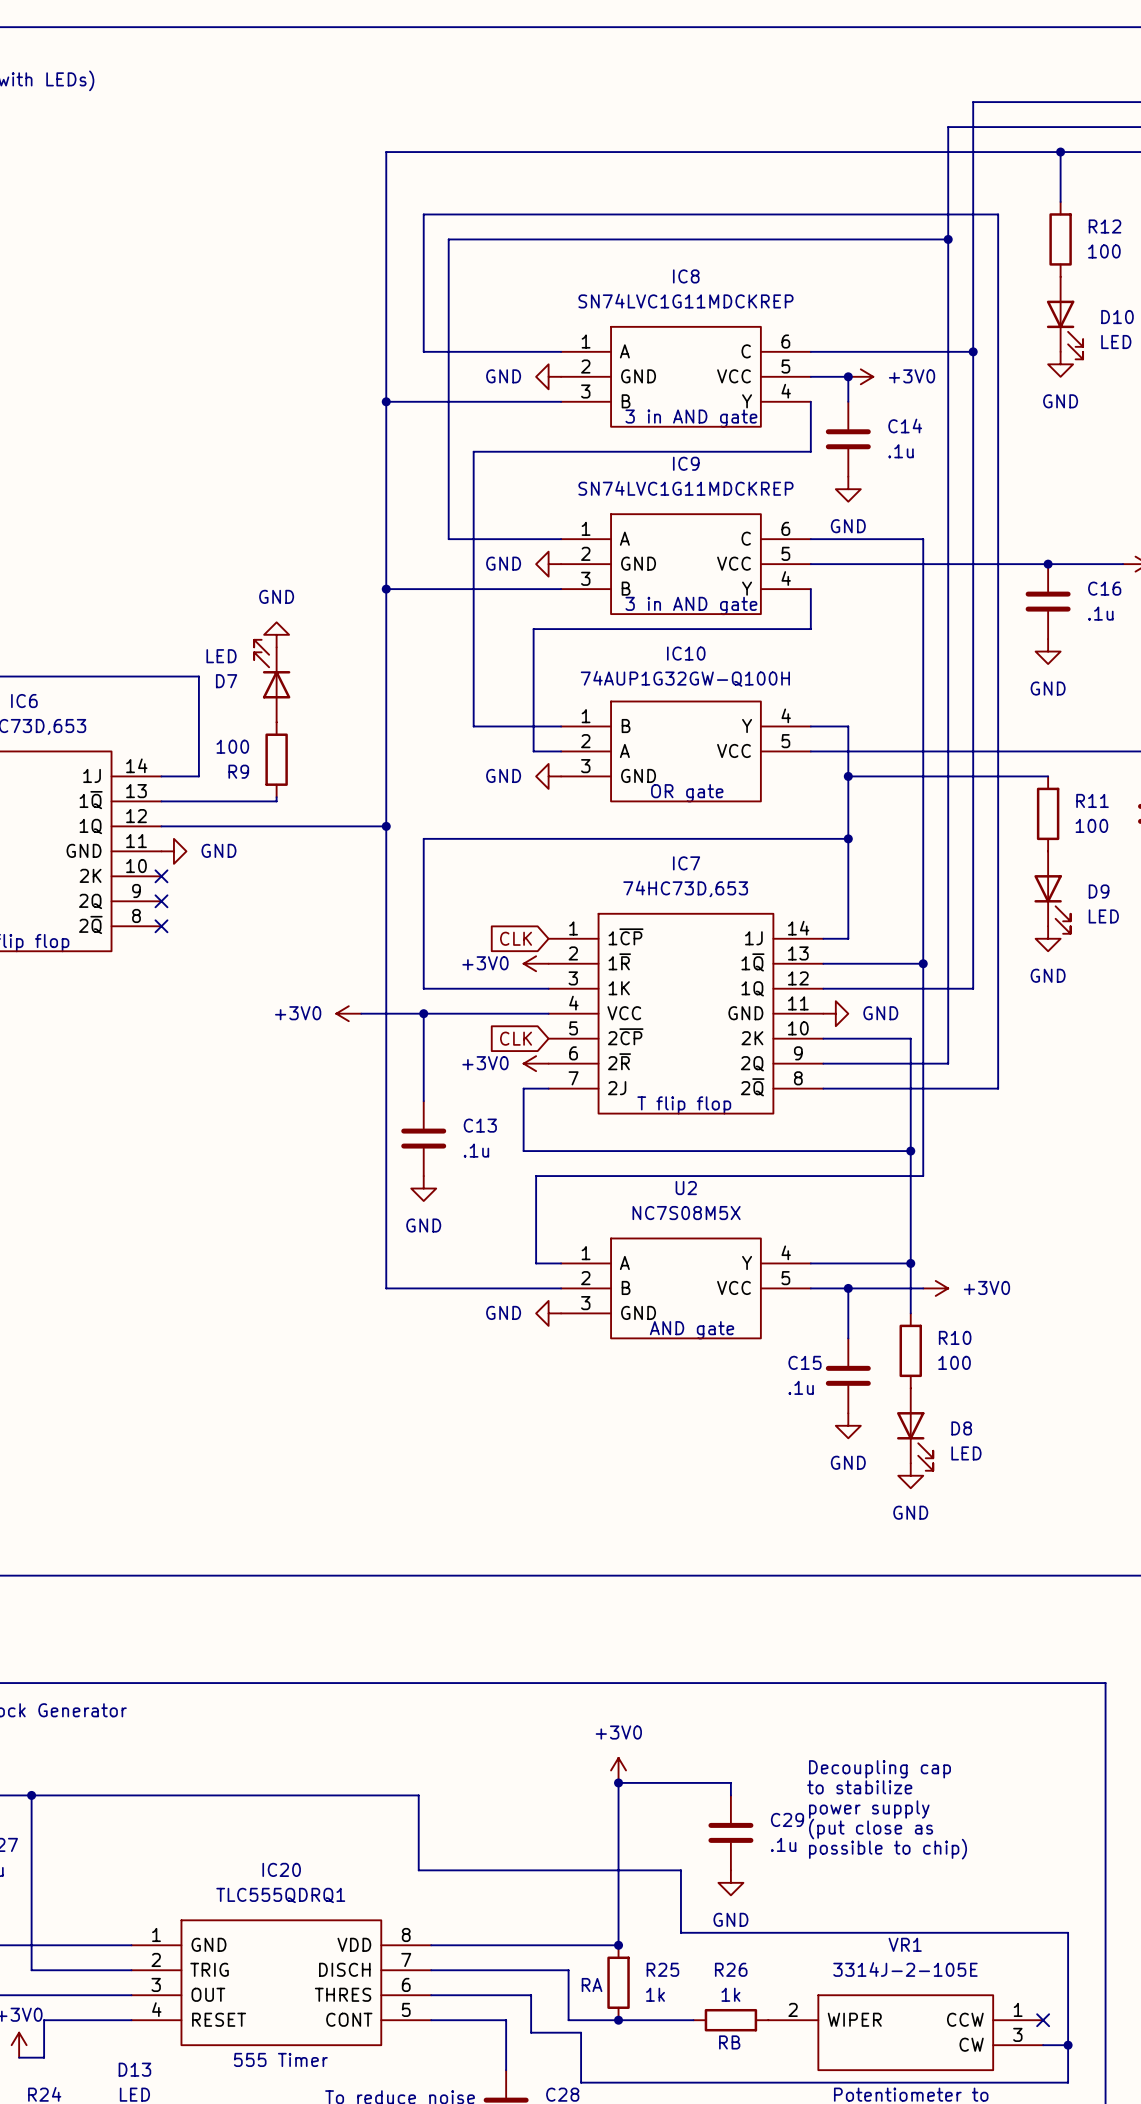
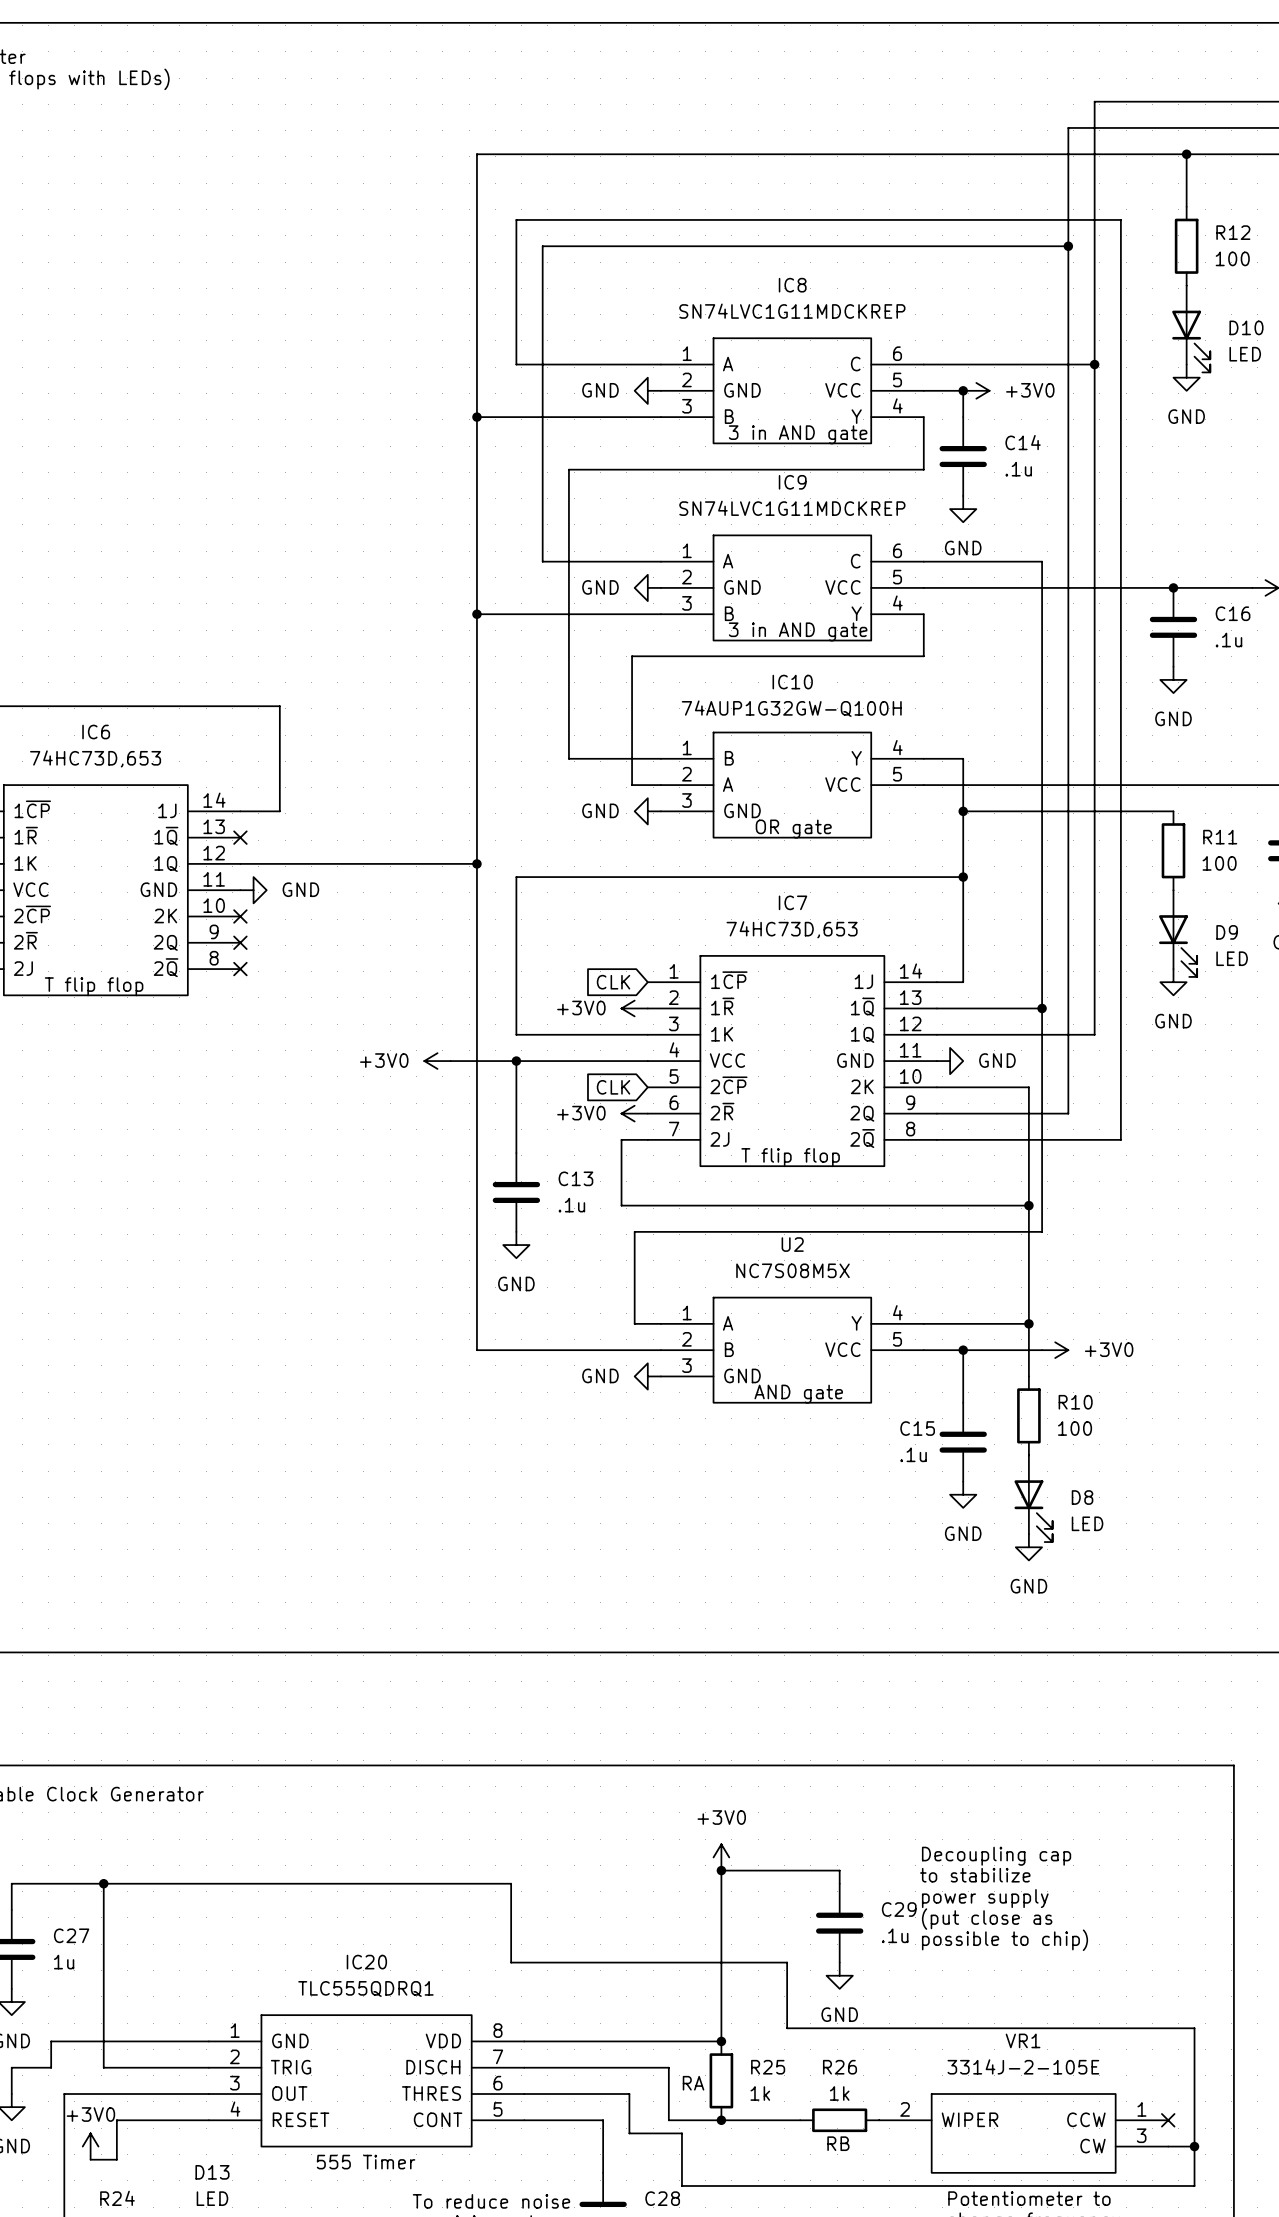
power symbol: GND (276, 634) -> none
D7: LED (272, 681) -> none
R9: 100 (276, 759) -> none
wire: (276, 797) (276, 801) (161, 801) -> none
no-connect mark: none -> (240, 837)

